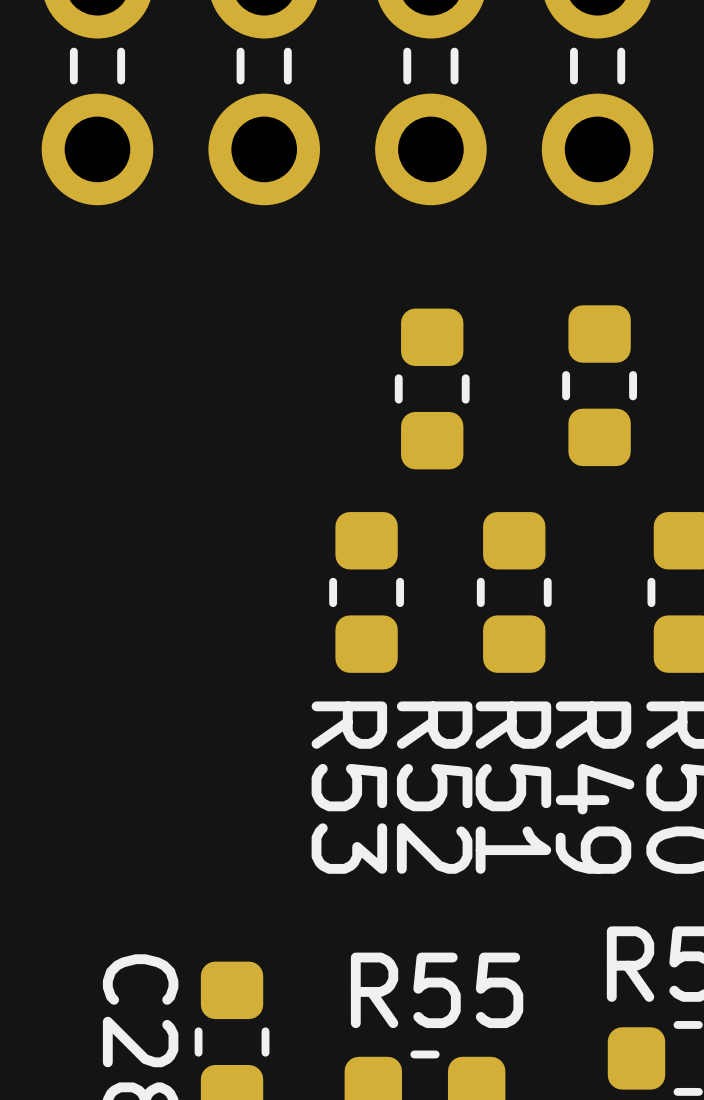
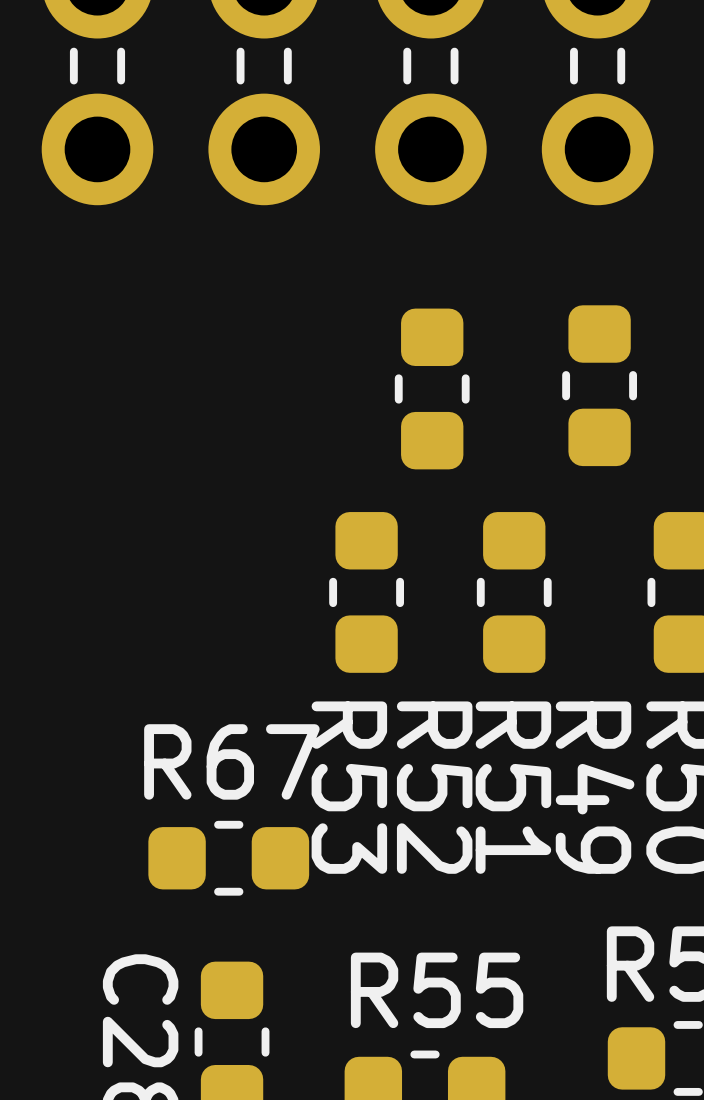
R67: none -> (228, 858)

